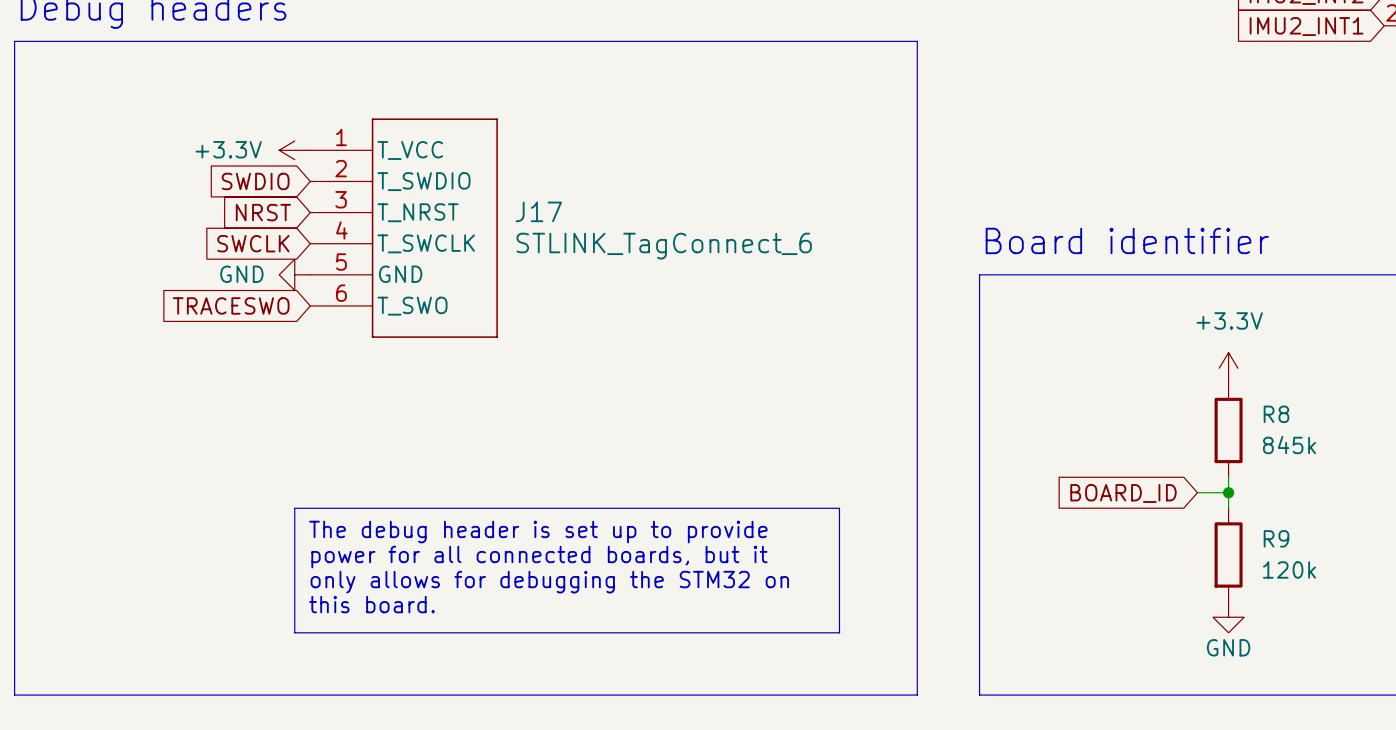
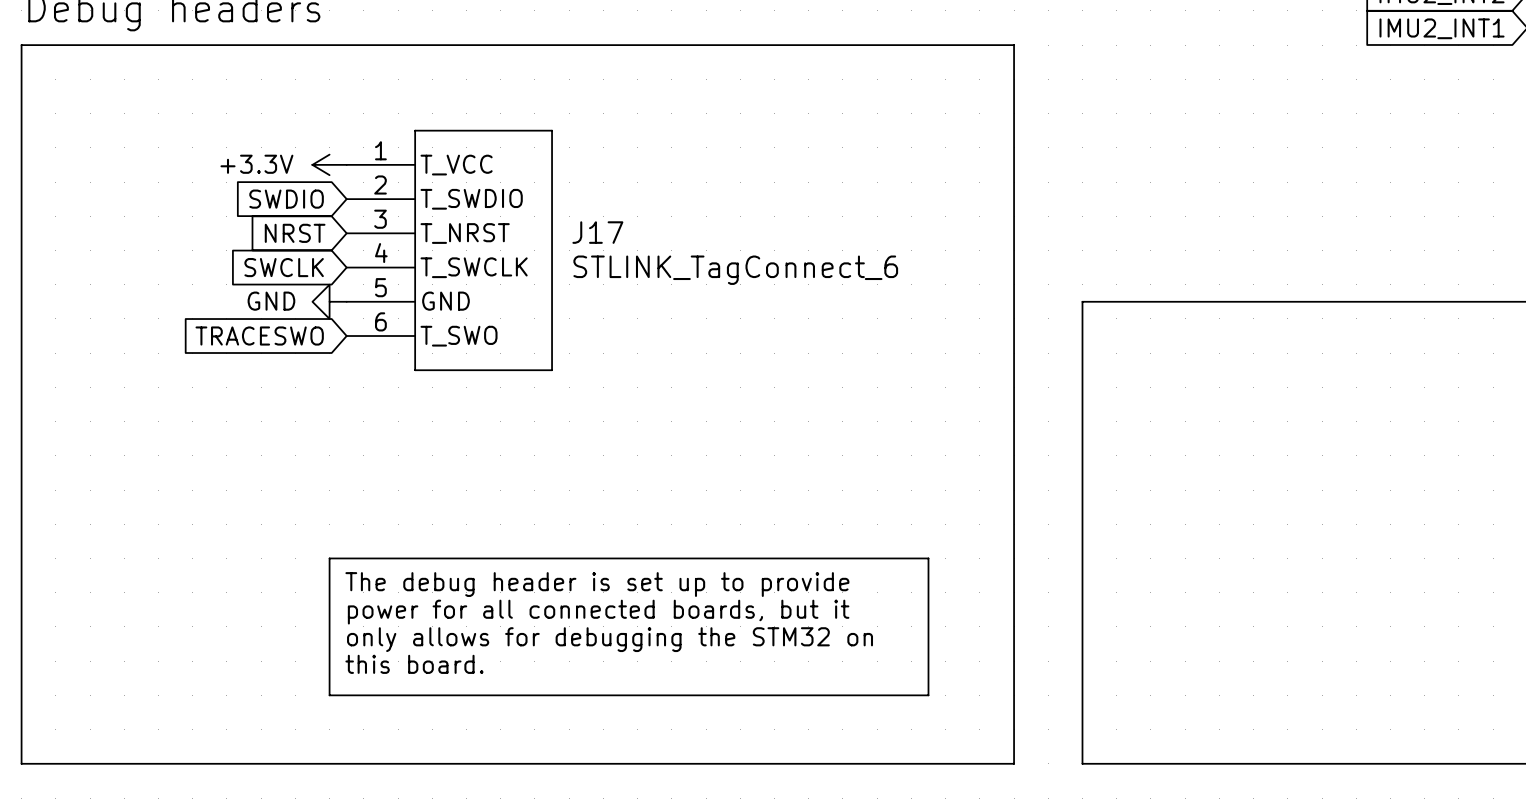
text: Board identifier (1127, 240) -> none
power symbol: +3.3V (1228, 368) -> none
R8: 845k (1228, 430) -> none
wire: (1228, 477) (1228, 508) -> none
wire: (1197, 492) (1228, 492) -> none
junction: (1228, 492) -> none
global label: BOARD_ID (1123, 493) -> none
R9: 120k (1228, 554) -> none
power symbol: GND (1228, 617) -> none

